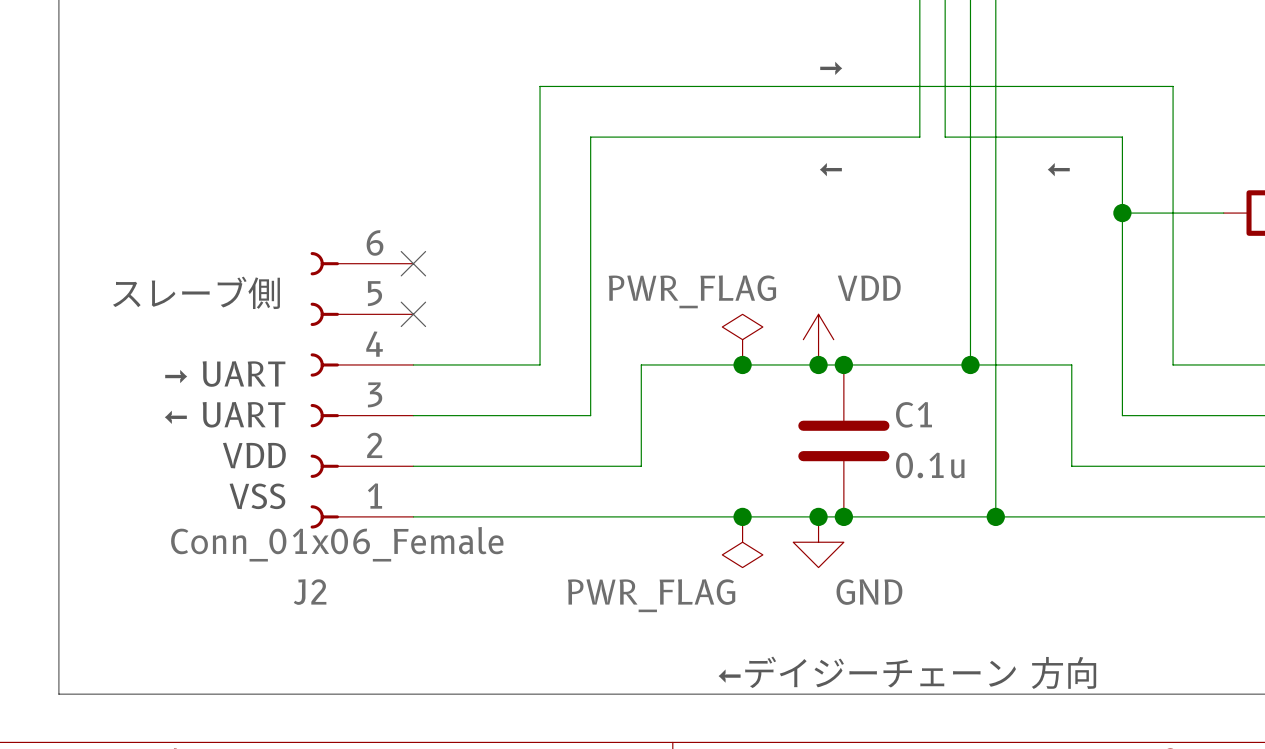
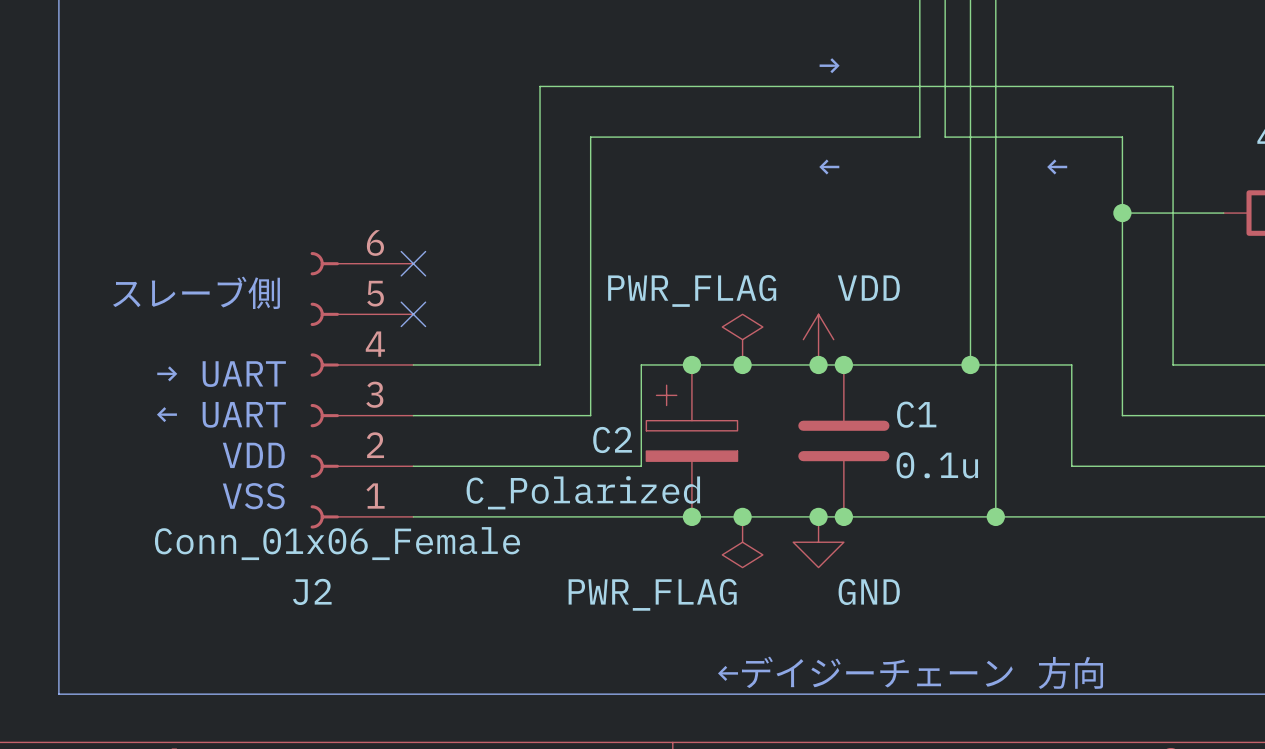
junction: none -> (691, 364)
C2: none -> C_Polarized (691, 440)
junction: none -> (691, 516)

